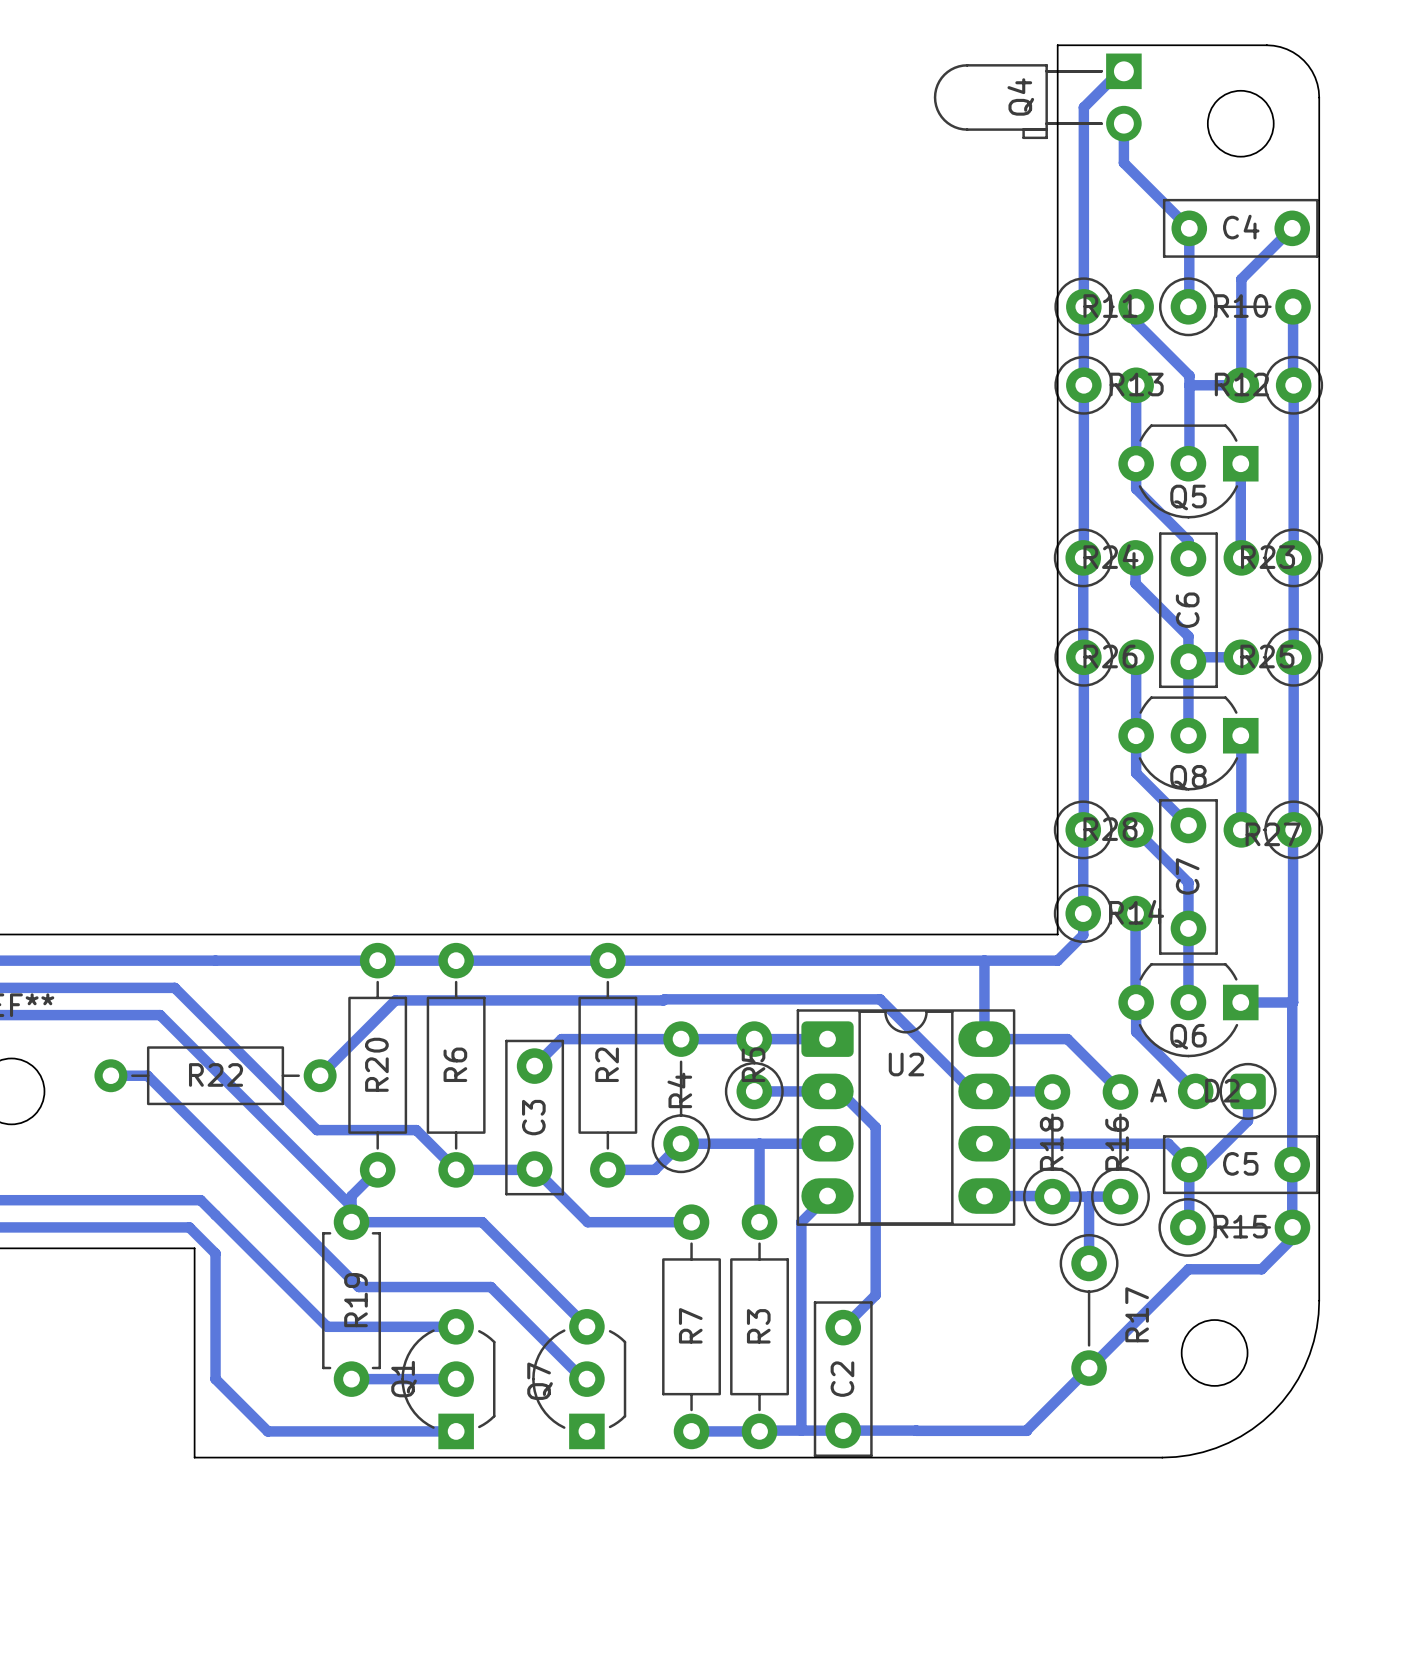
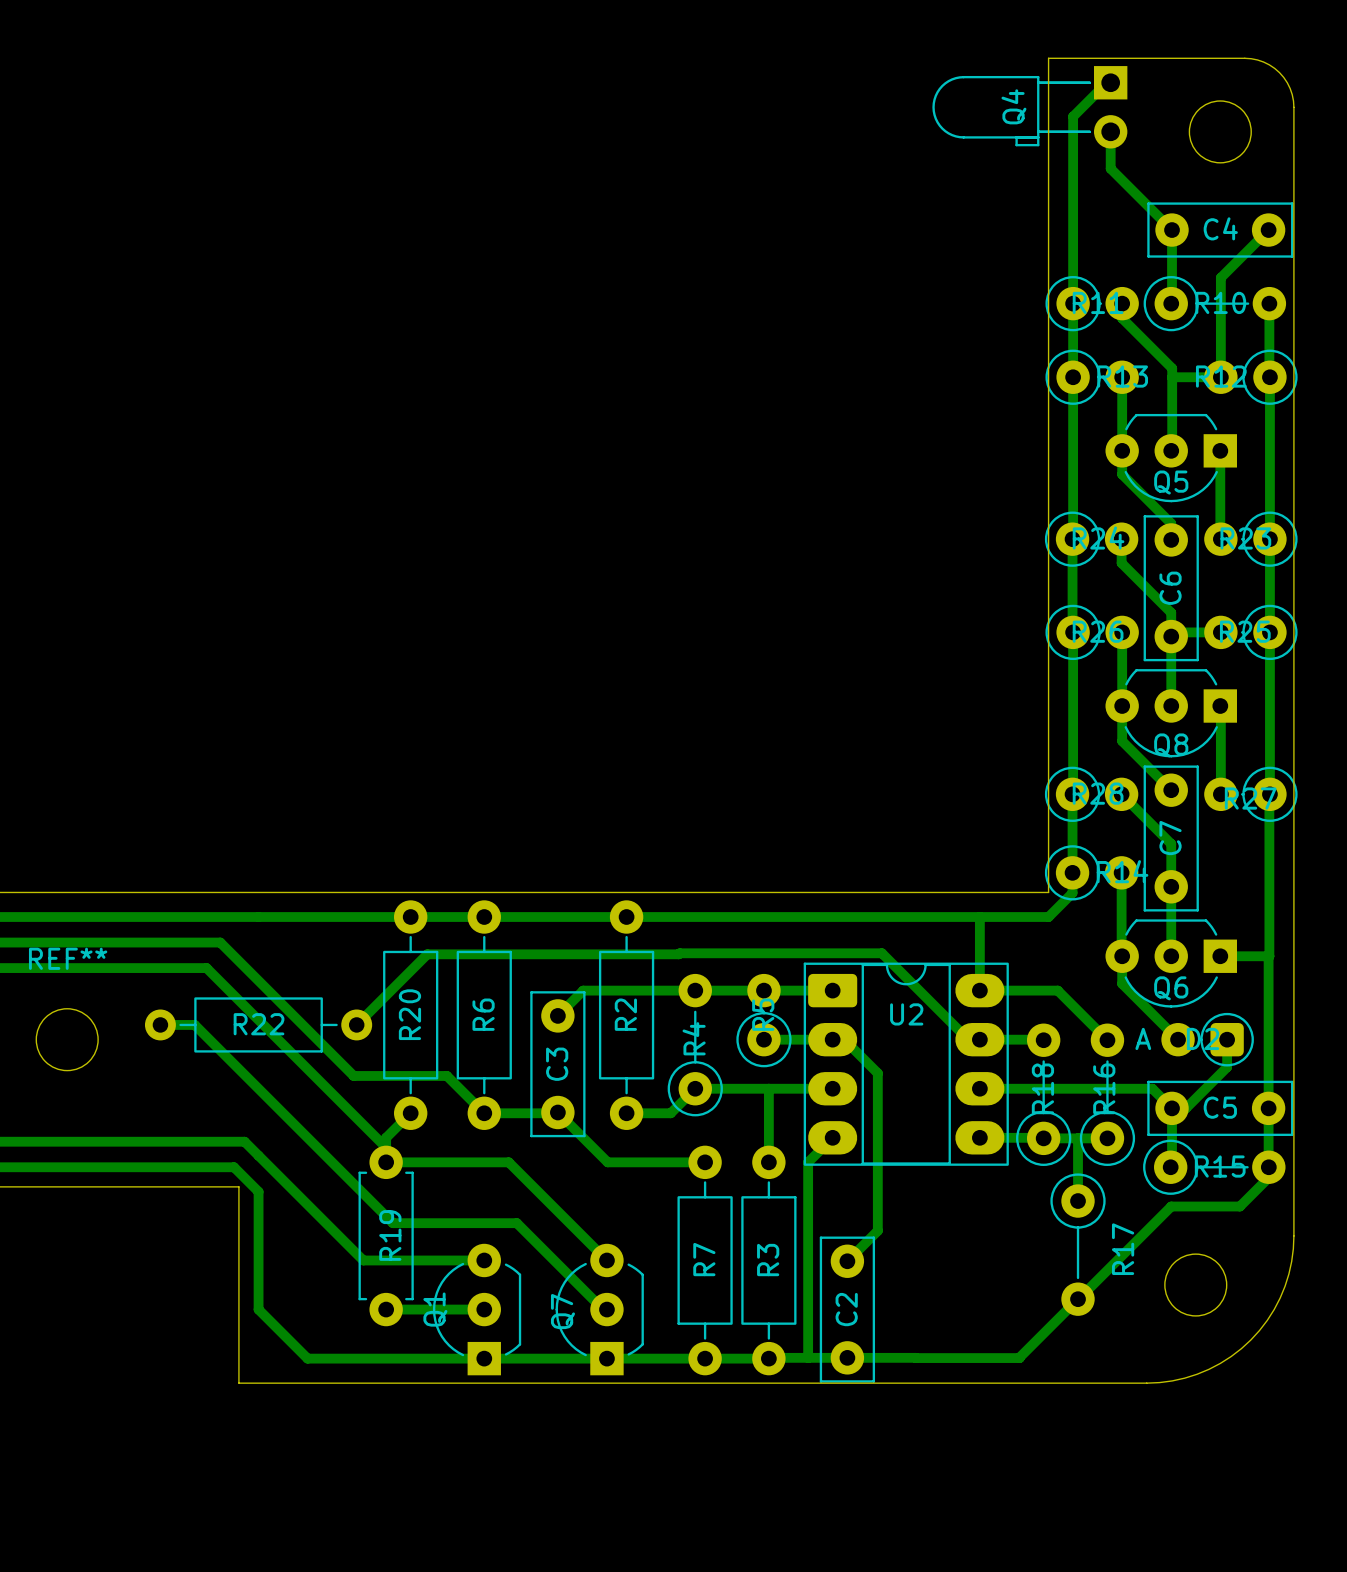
bottom track: none -> (484, 1358) (705, 1358)

